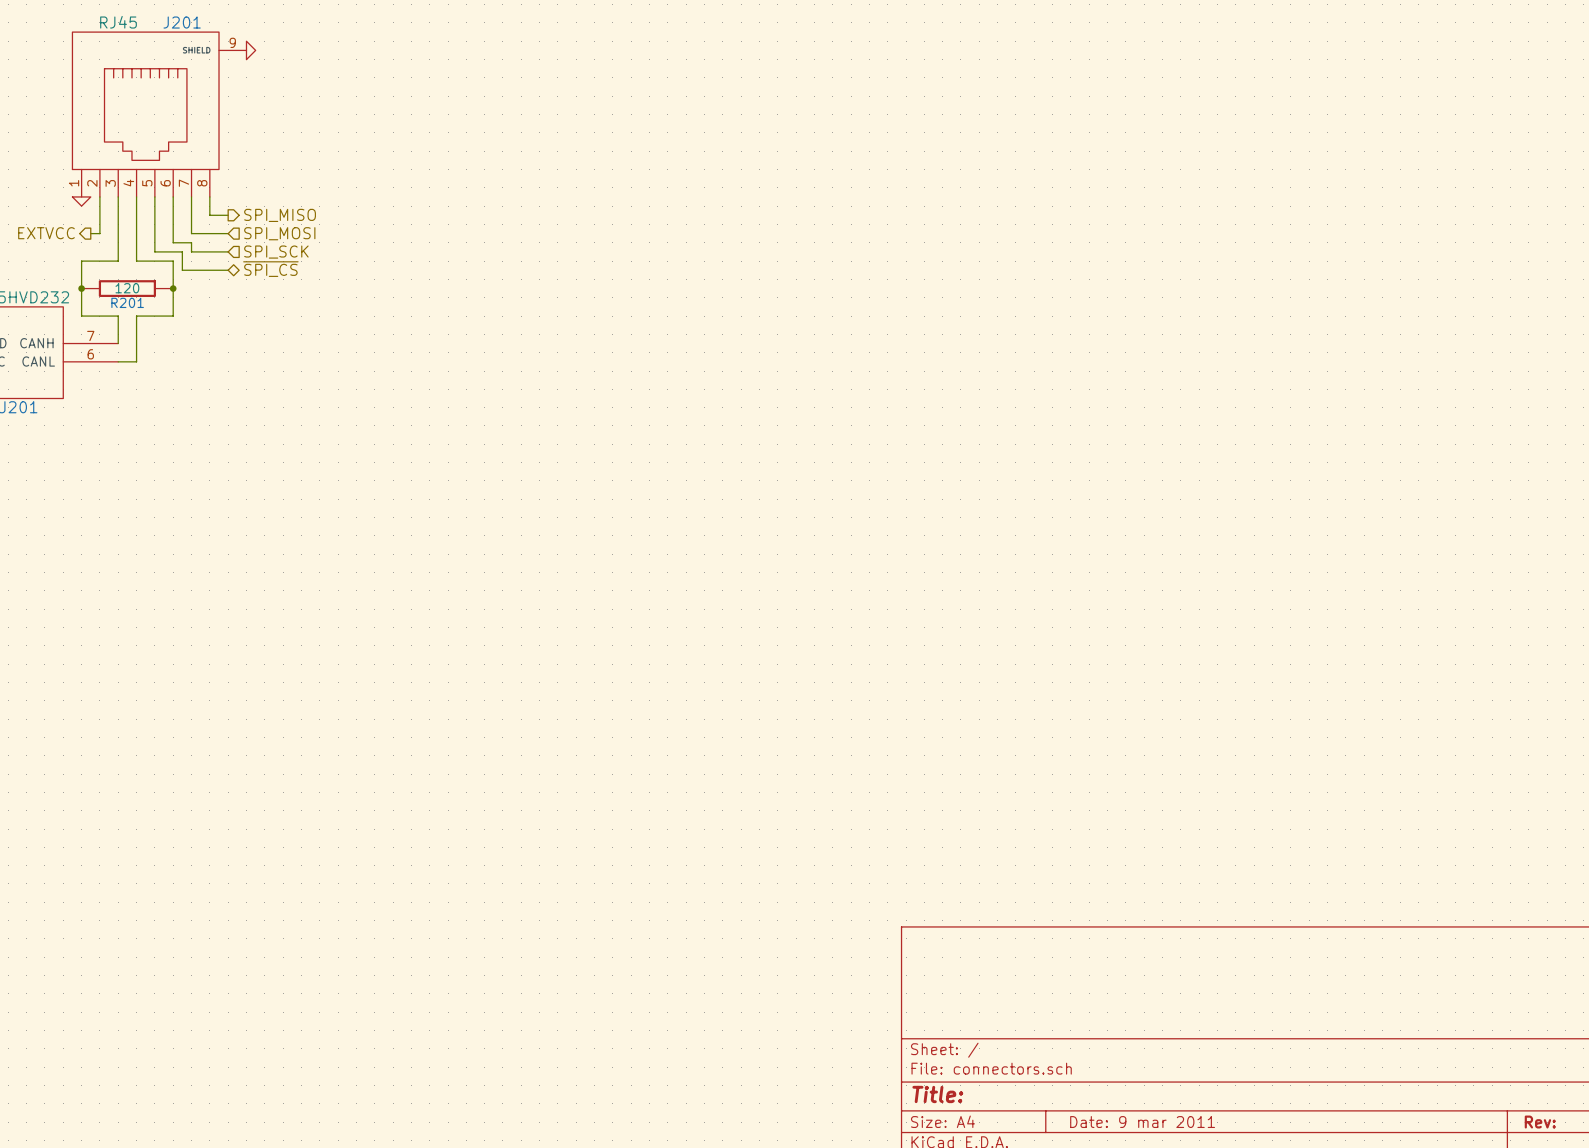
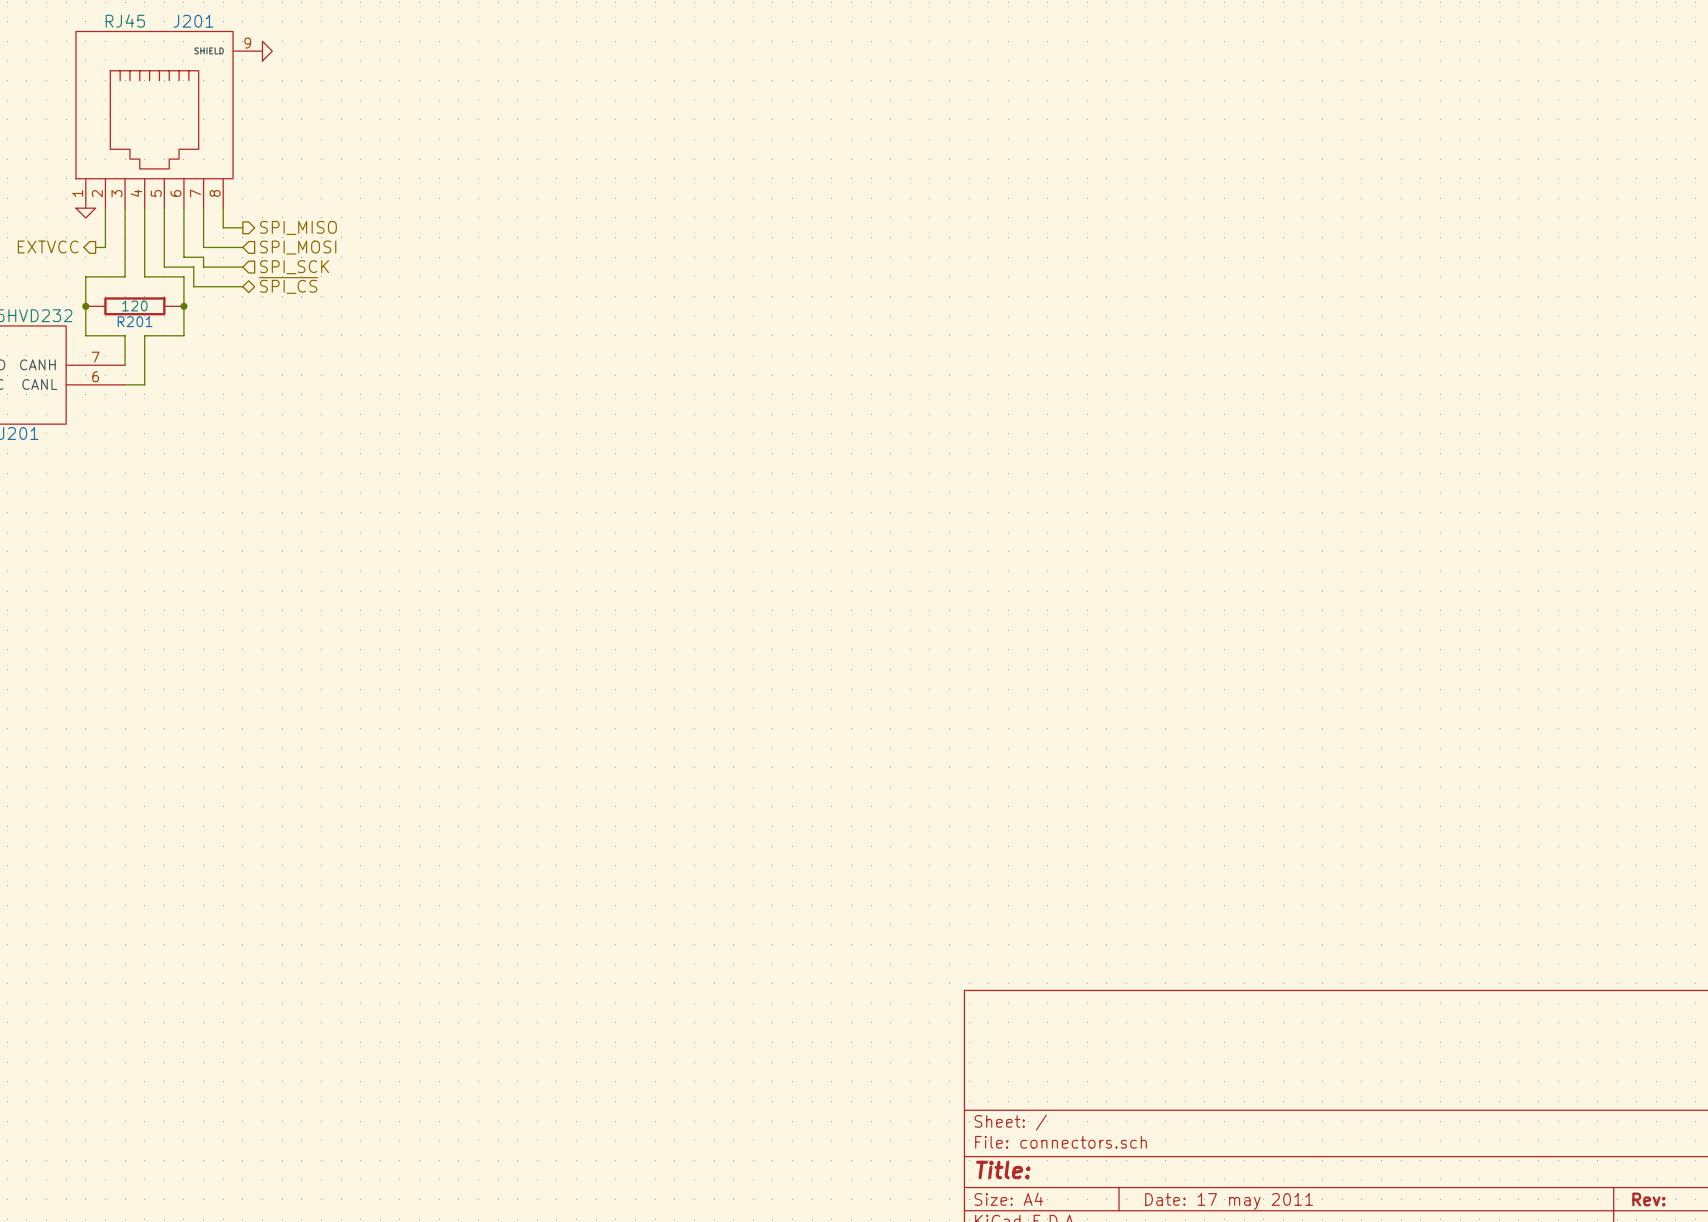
title block: Date: 9 mar 2011 (1142, 1122) -> Date: 17 may 2011 (1229, 1201)

